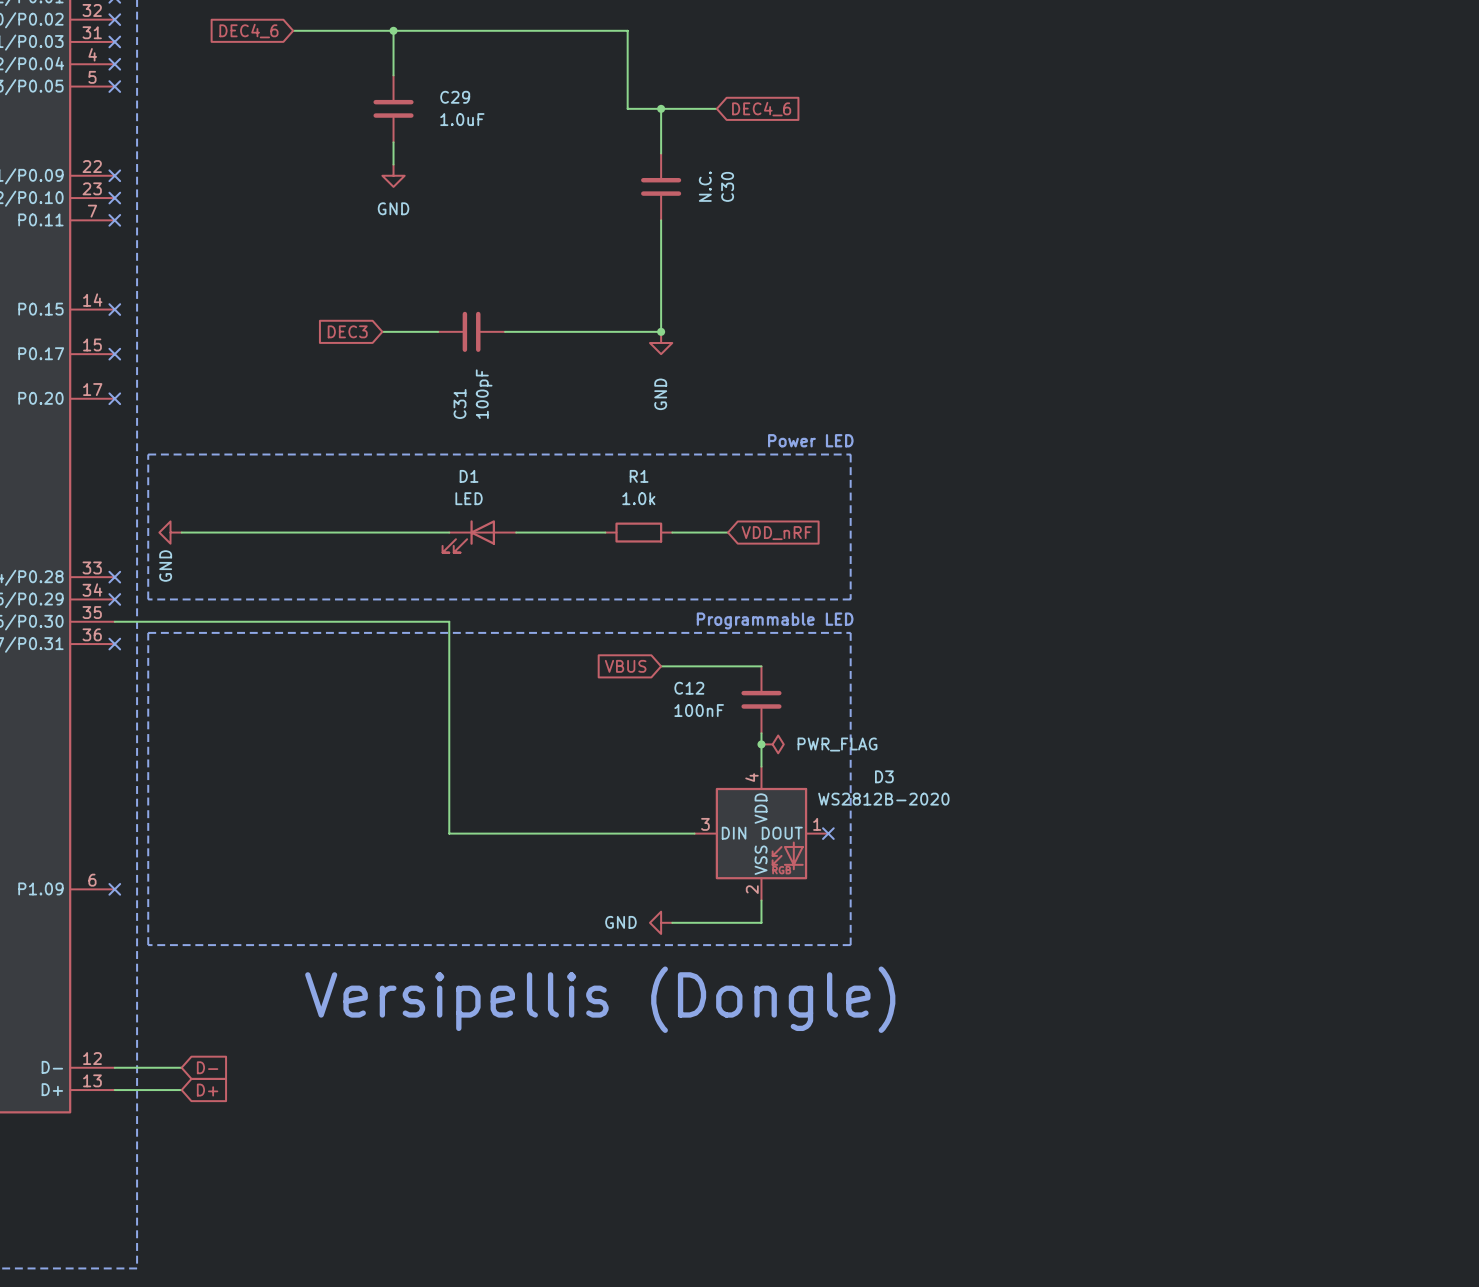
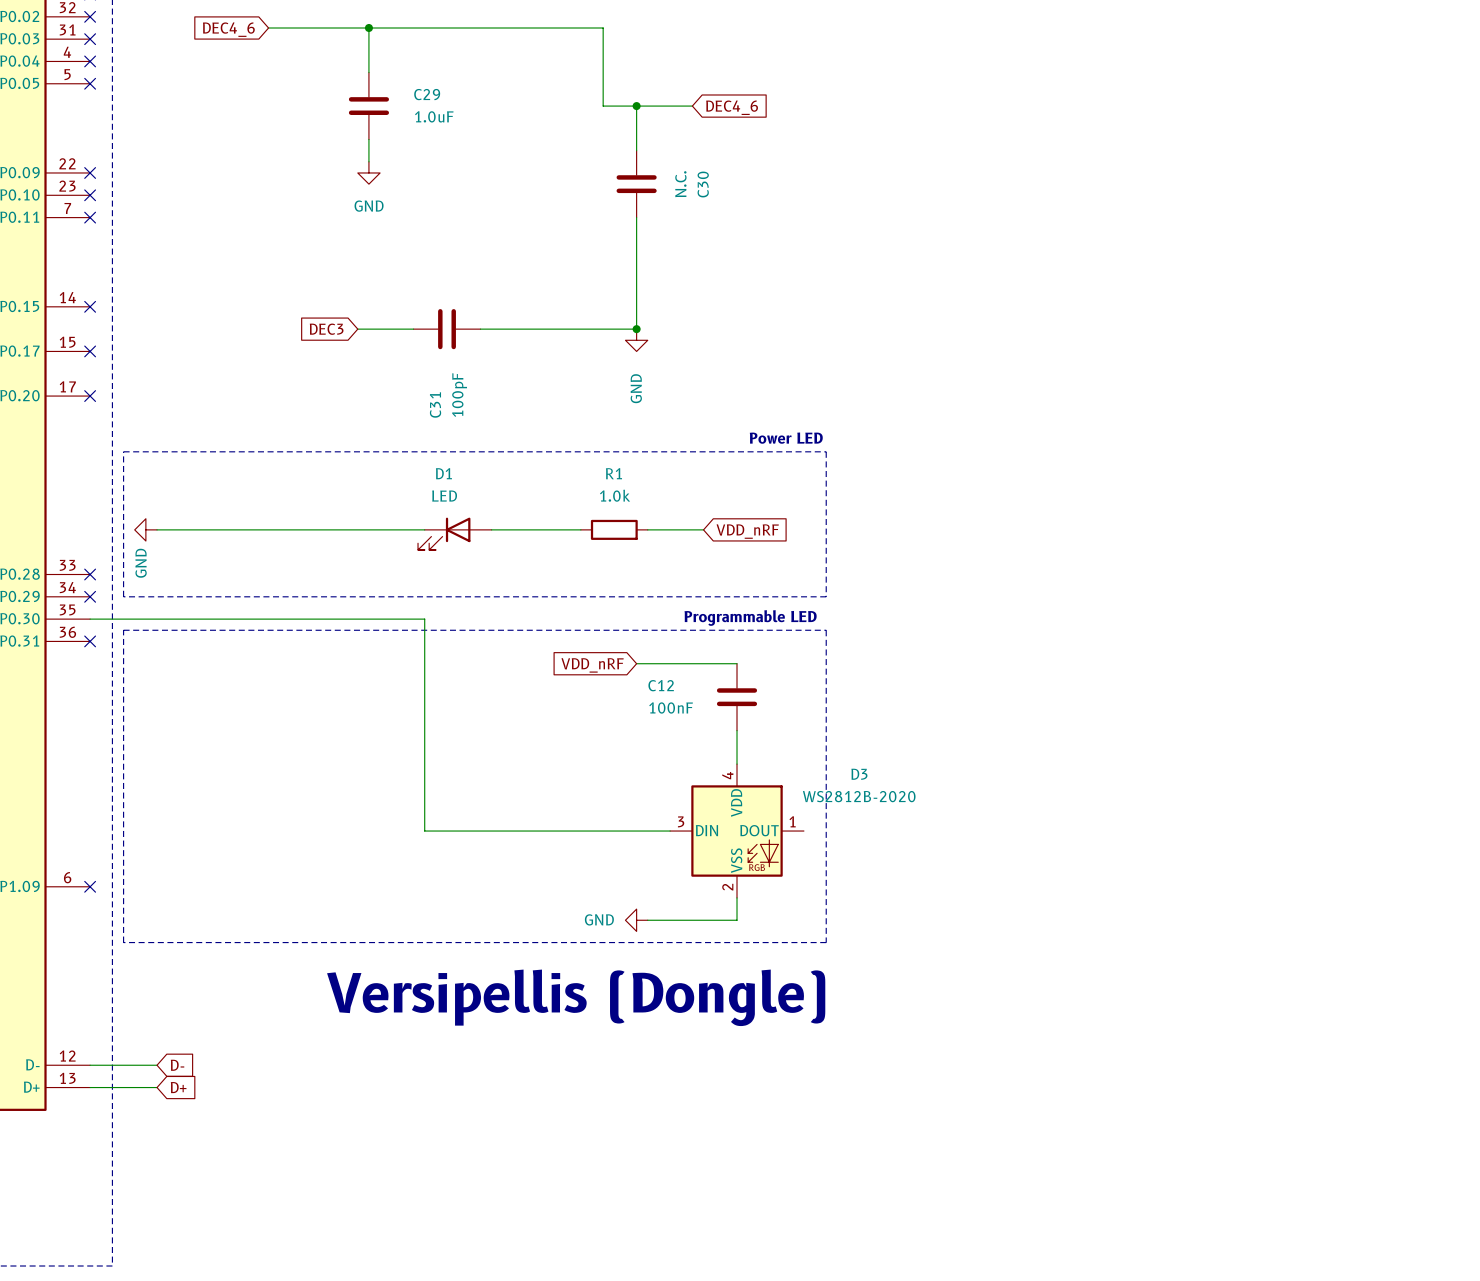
global label: VBUS (625, 666) -> VDD_nRF (592, 665)
junction: (761, 744) -> none
power symbol: PWR_FLAG (772, 744) -> none
no-connect mark: (828, 833) -> none

